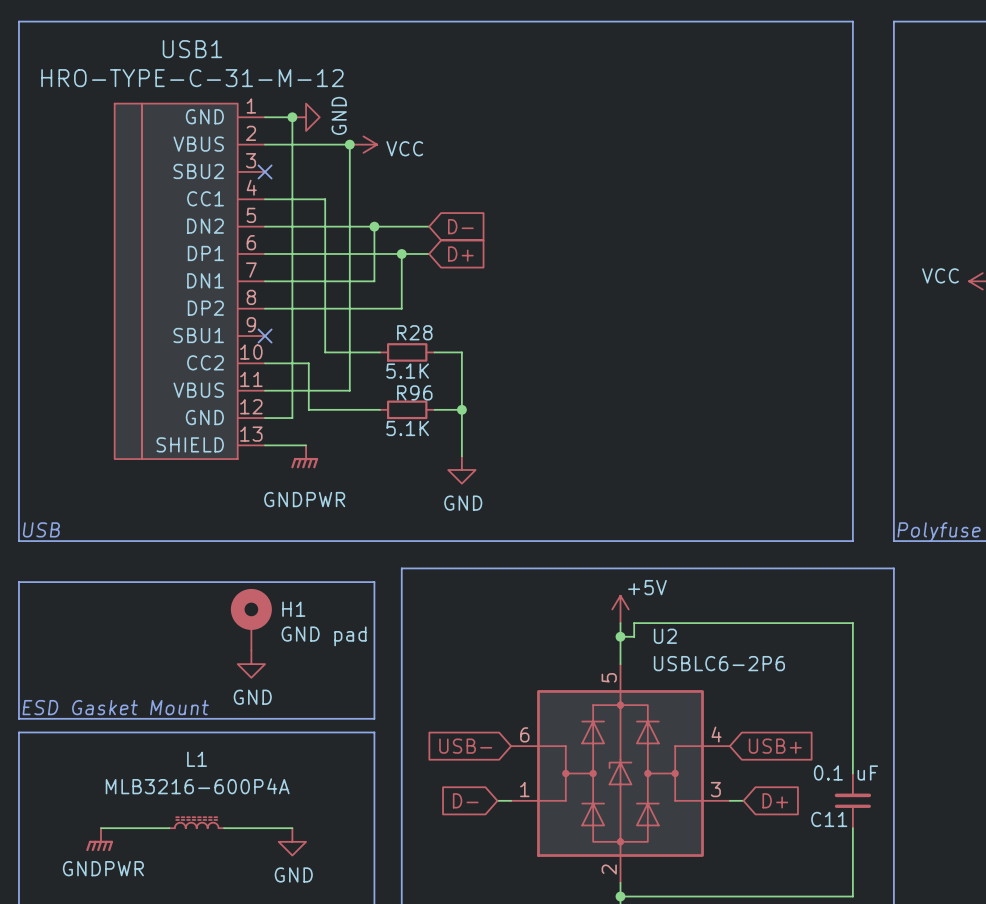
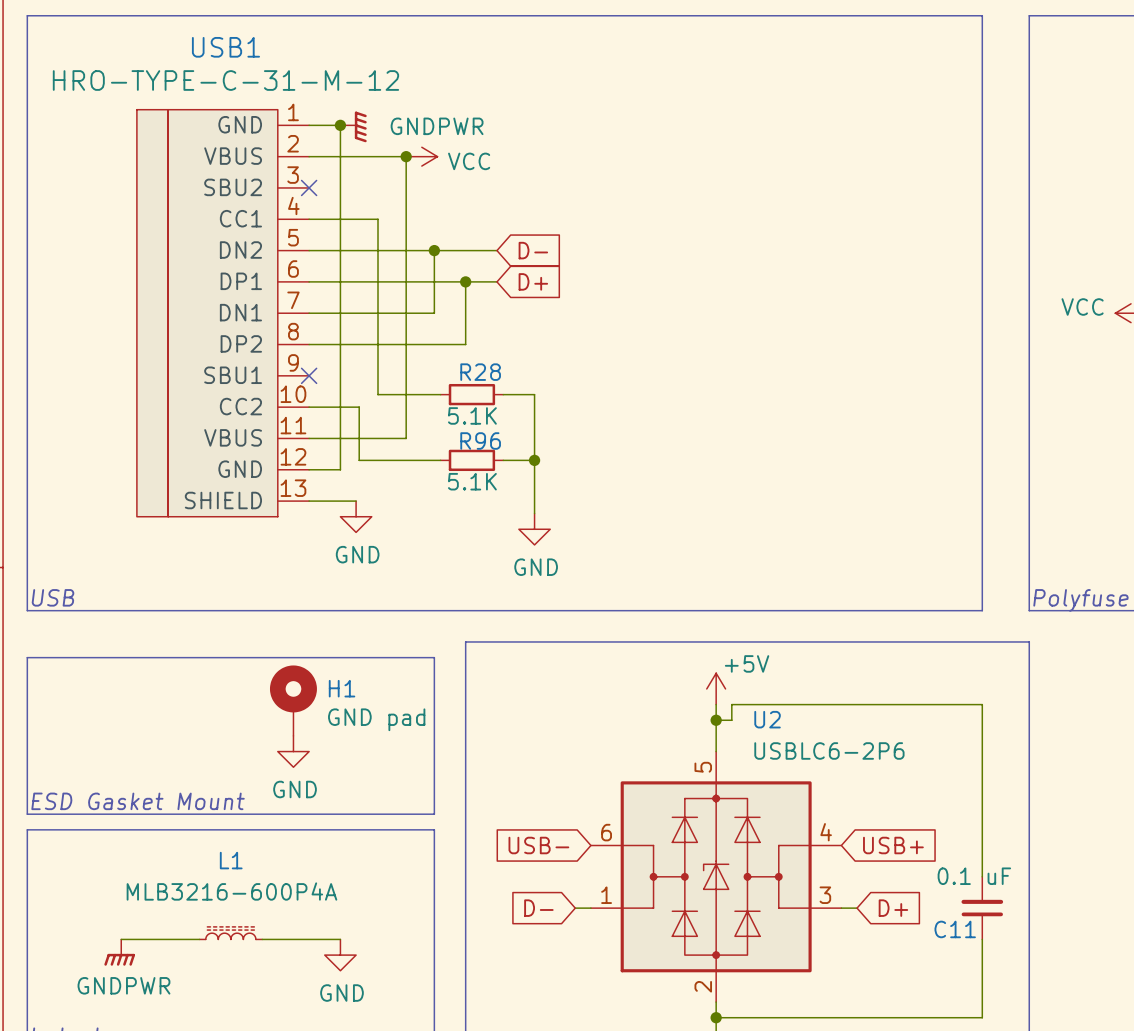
power symbol: GND (306, 117) -> GNDPWR (353, 126)
power symbol: GNDPWR (304, 456) -> GND (356, 516)

